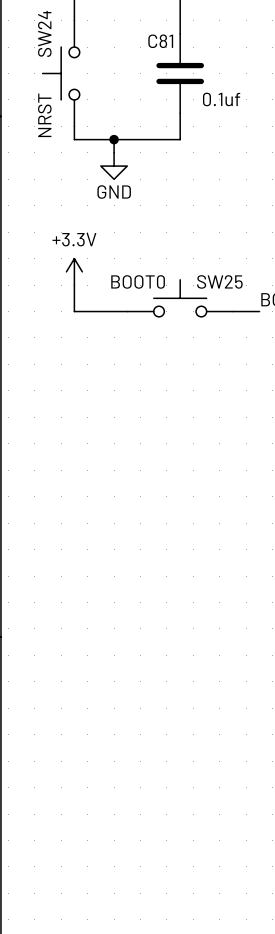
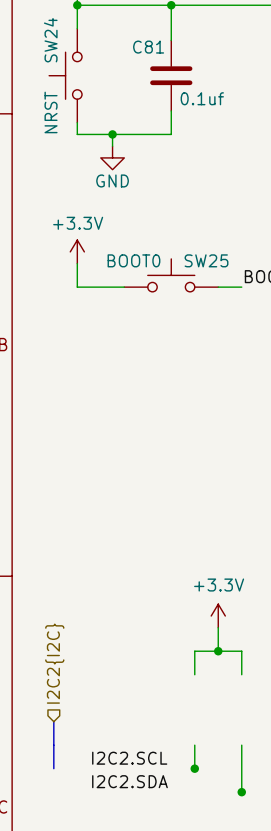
power symbol: none -> +3.3V (218, 615)
wire: none -> (218, 627) (218, 651)
junction: none -> (218, 651)
hierarchical label: none -> I2C2{I2C} (54, 663)
wire: none -> (194, 674) (194, 651) (241, 651) (241, 674)
bus: none -> (53, 721) (53, 768)
wire: none -> (194, 745) (194, 768)
wire: none -> (241, 745) (241, 792)
label: none -> I2C2.SCL (129, 758)
junction: none -> (194, 768)
label: none -> I2C2.SDA (129, 781)
junction: none -> (241, 792)

